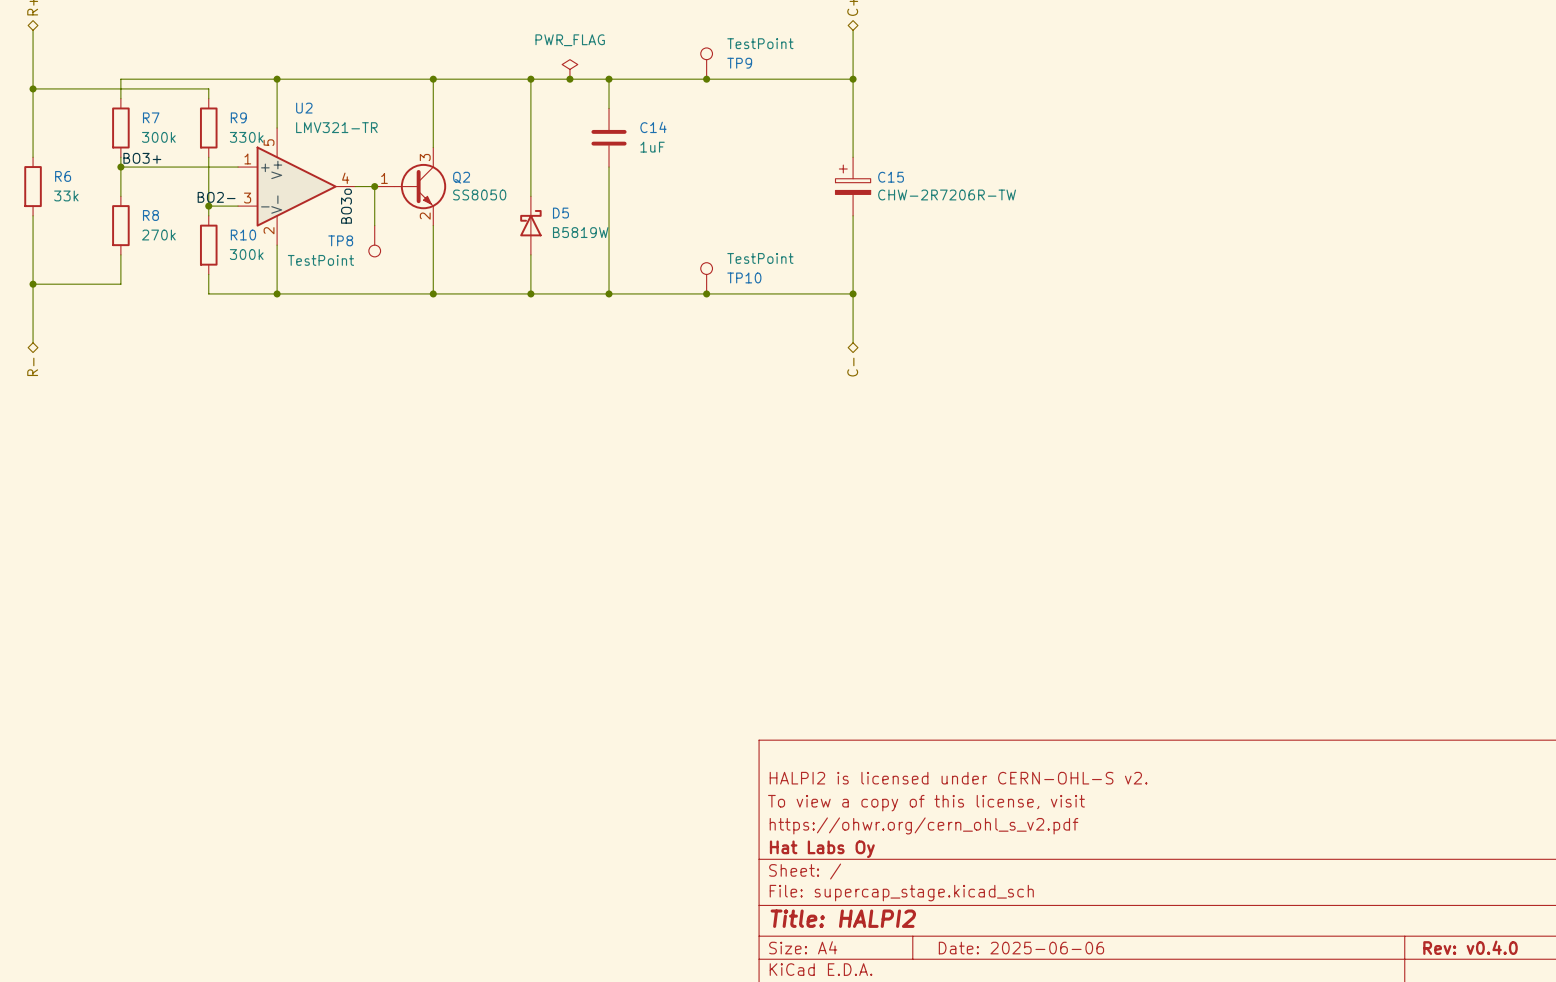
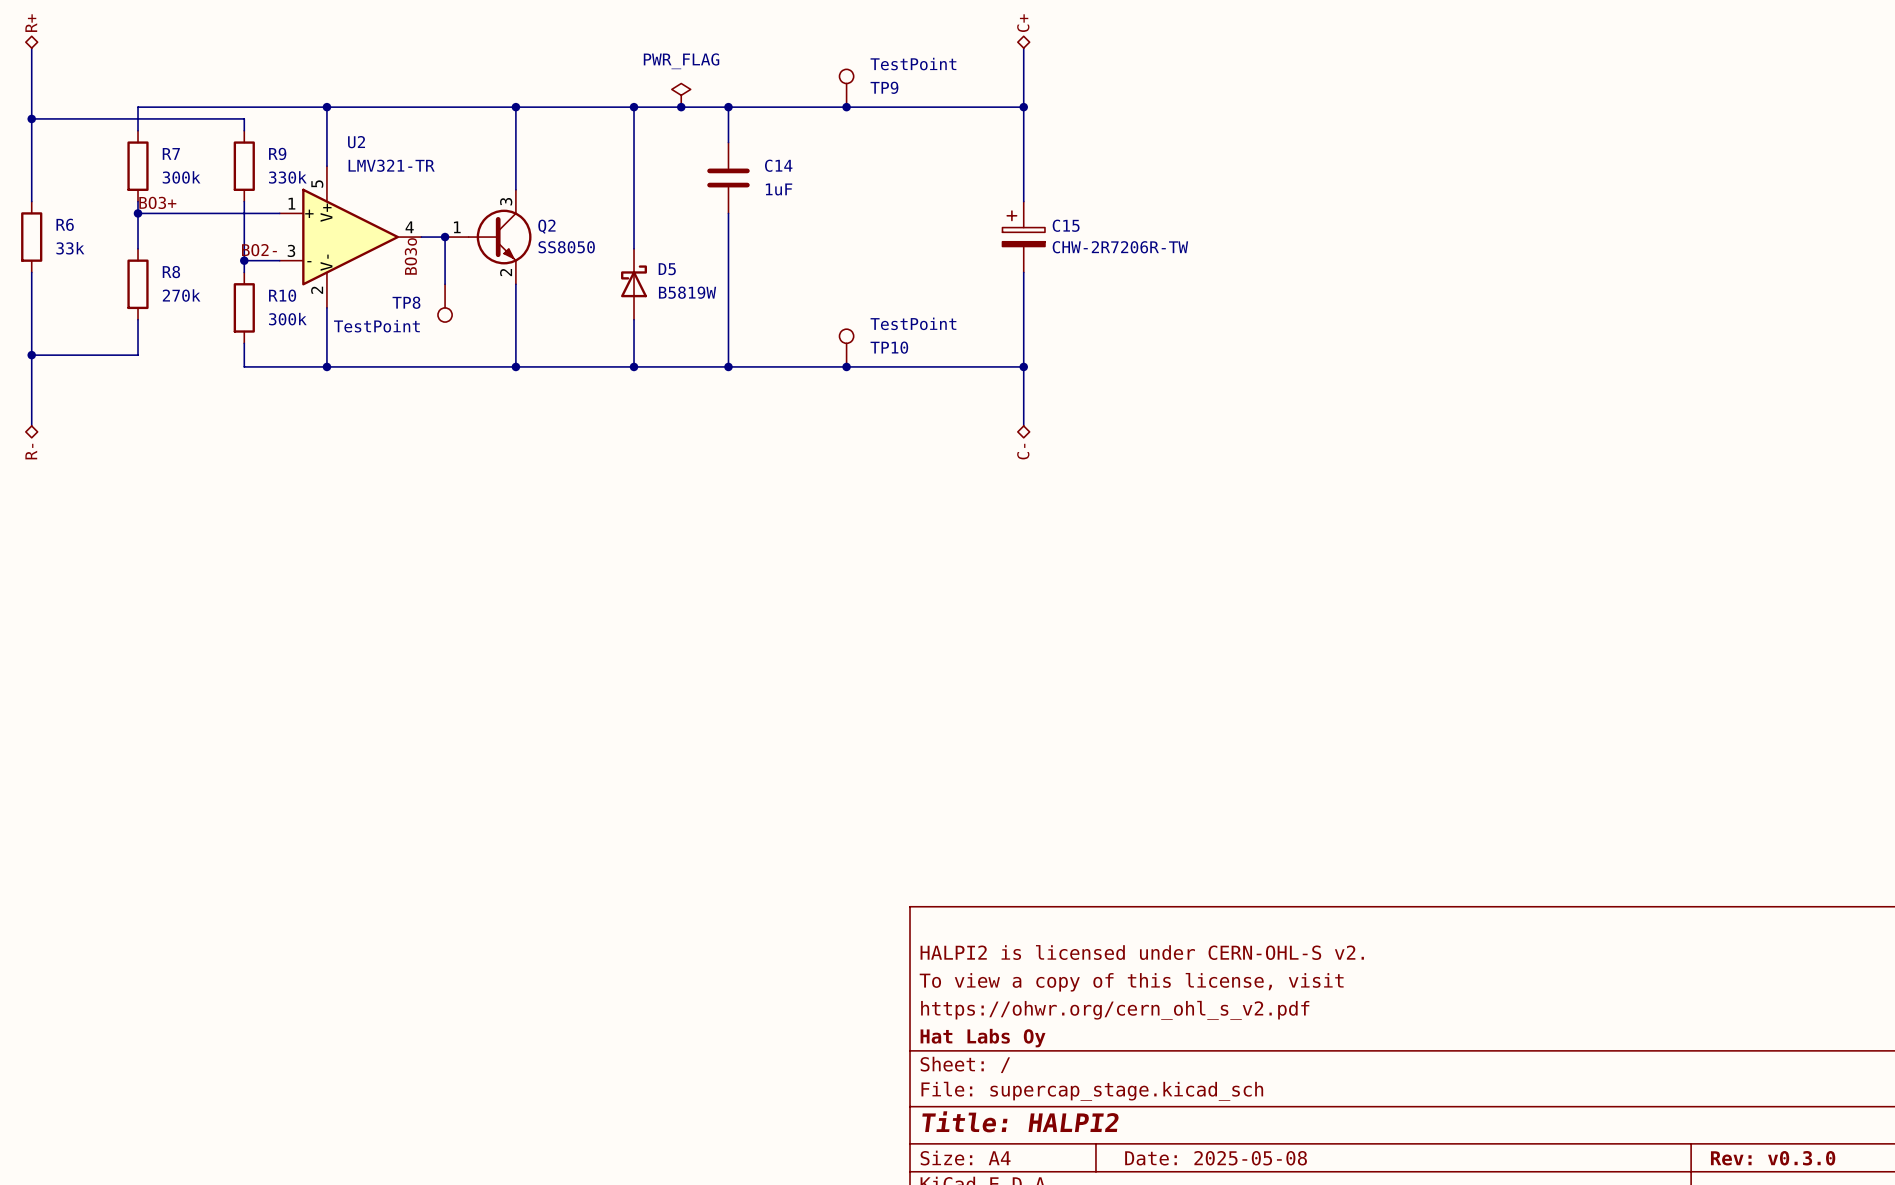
title block: Rev: v0.4.0 (1470, 947) -> Rev: v0.3.0 (1773, 1158)
title block: Date: 2025-06-06 (1021, 948) -> Date: 2025-05-08 (1216, 1158)

